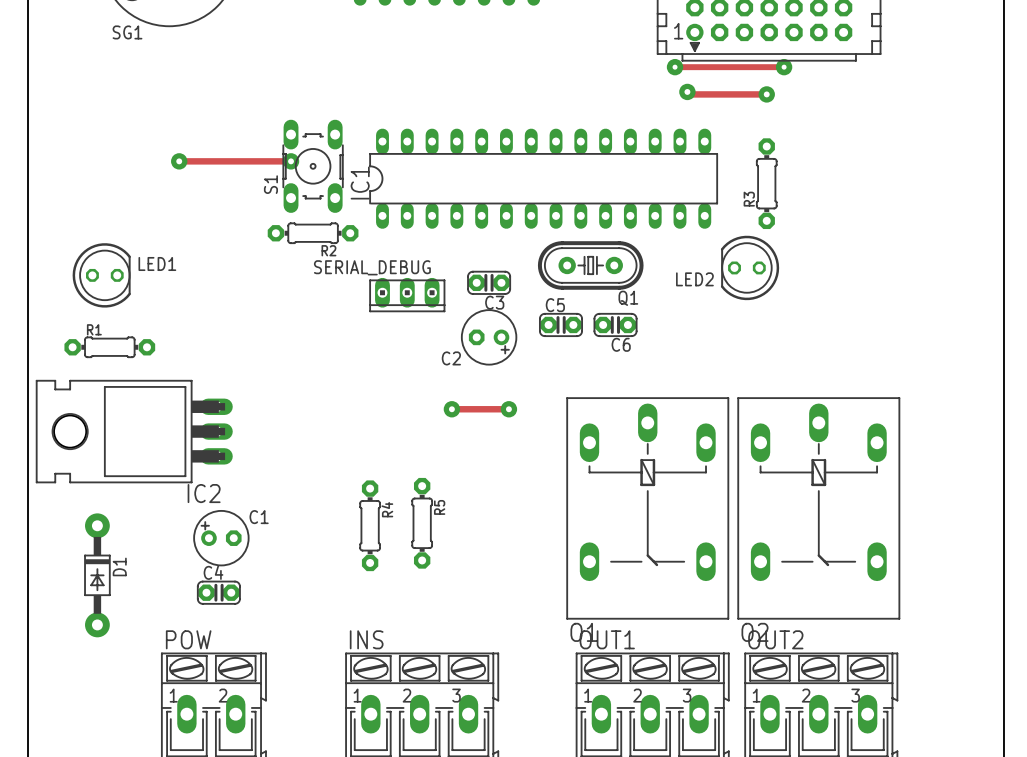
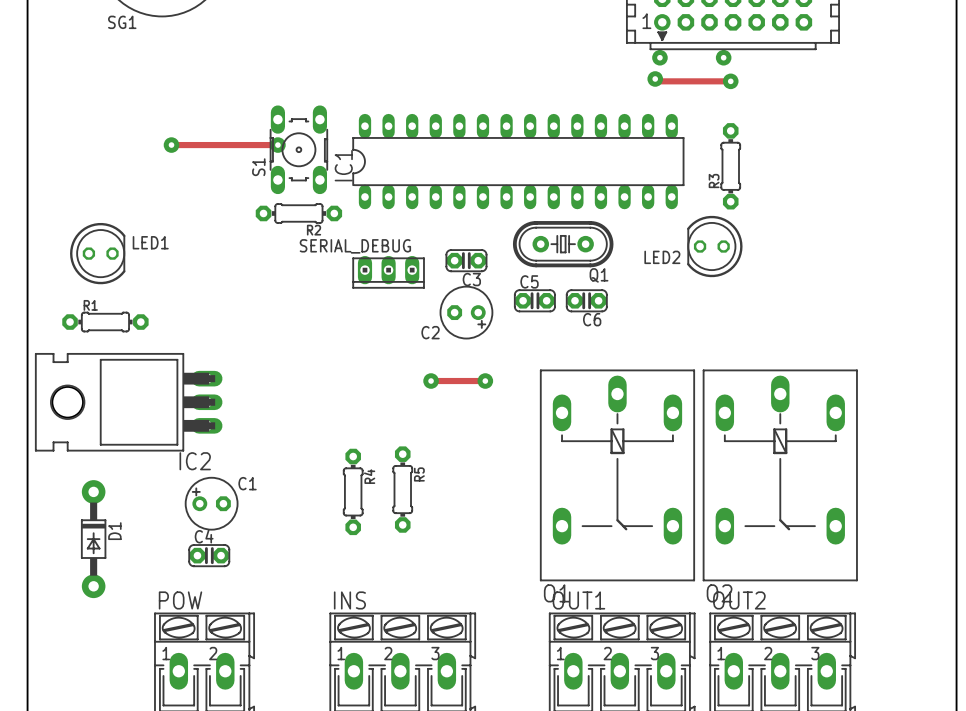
track: (675, 67) (784, 67) -> none
via: (675, 67) -> none
via: (784, 67) -> none
via: none -> (659, 57)
via: none -> (723, 57)

